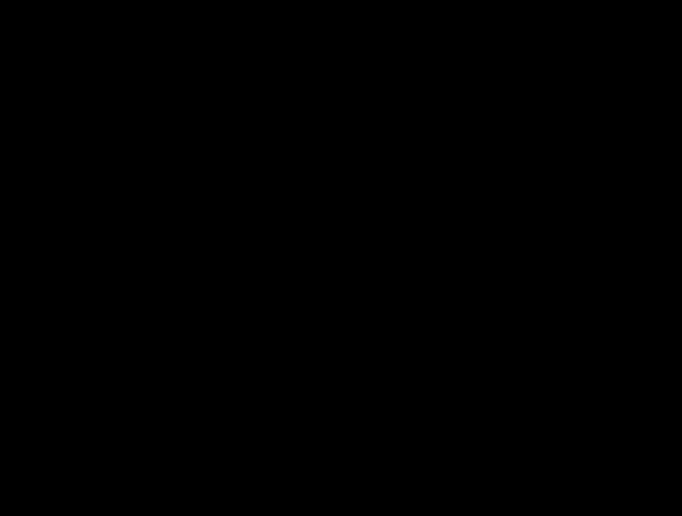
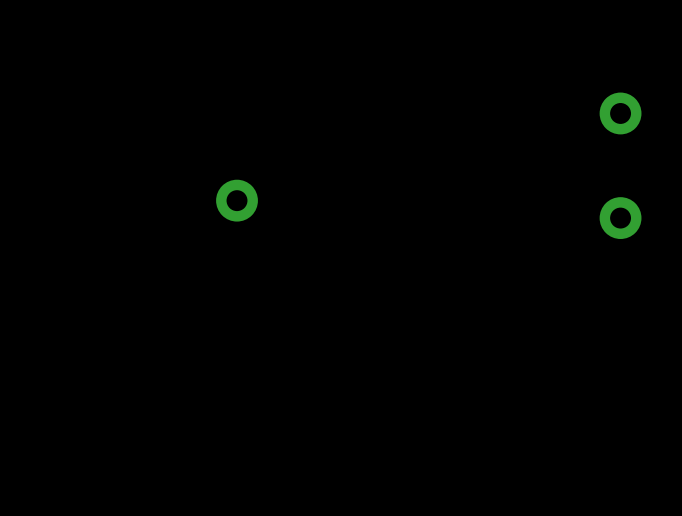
via: none -> (620, 113)
via: none -> (237, 200)
via: none -> (620, 218)

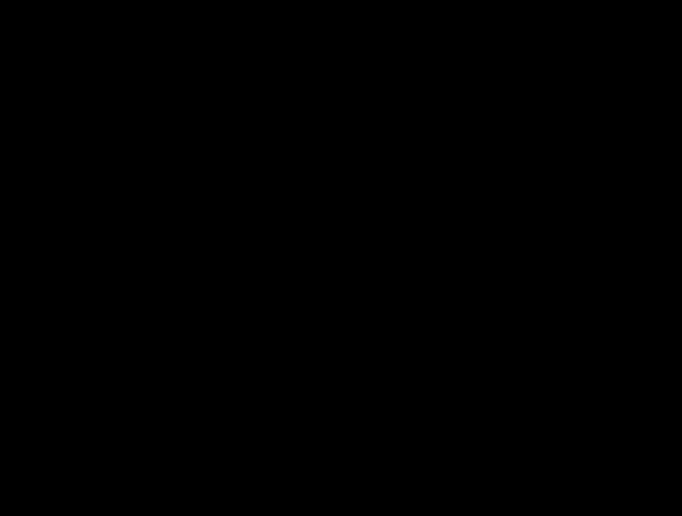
via: (620, 113) -> none
via: (237, 200) -> none
via: (620, 218) -> none

